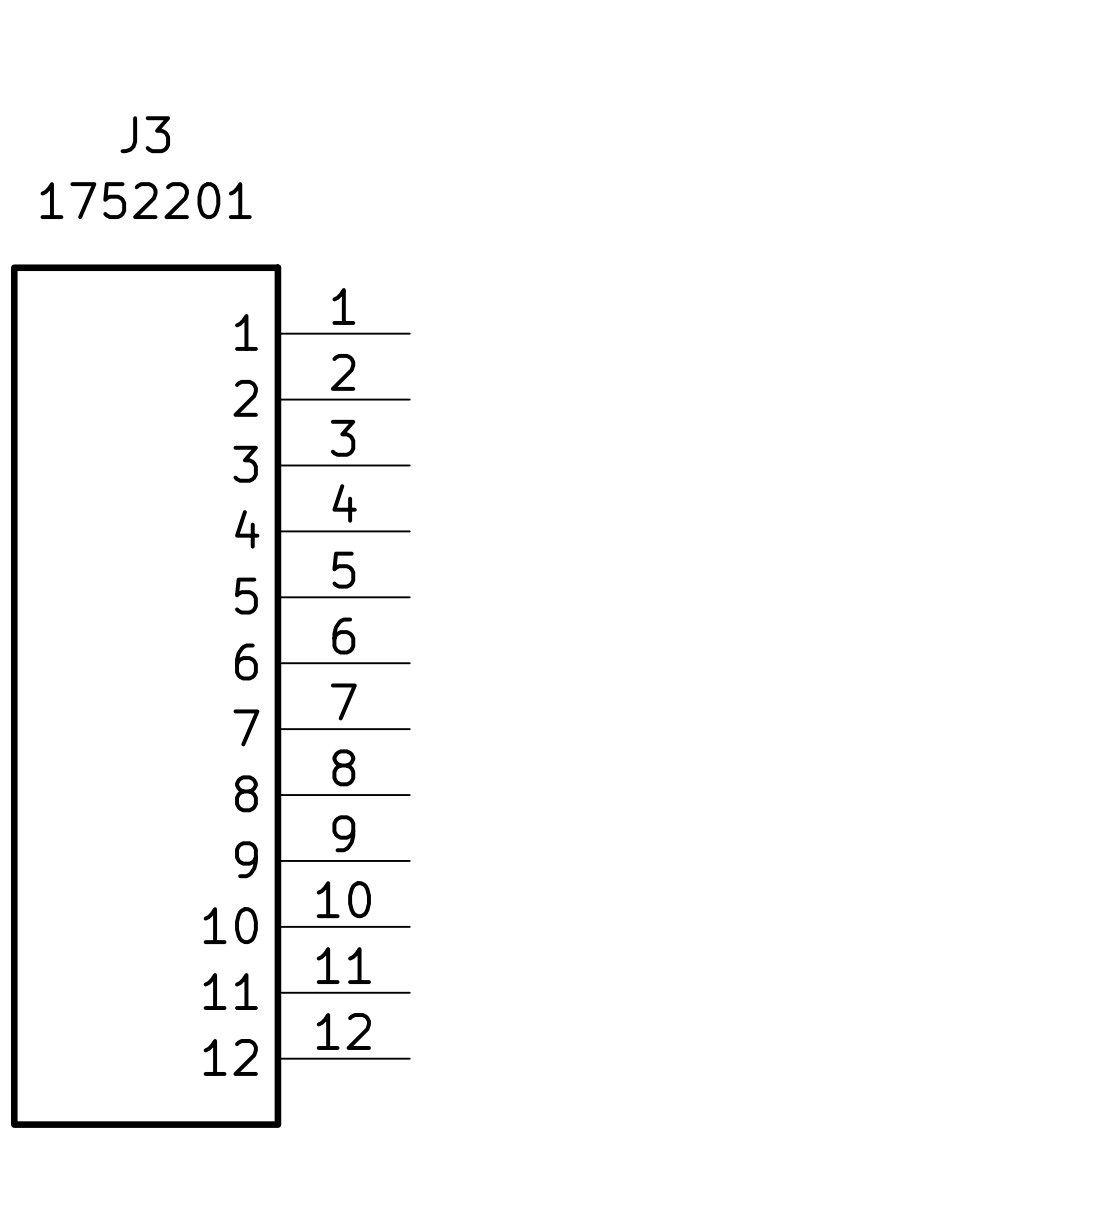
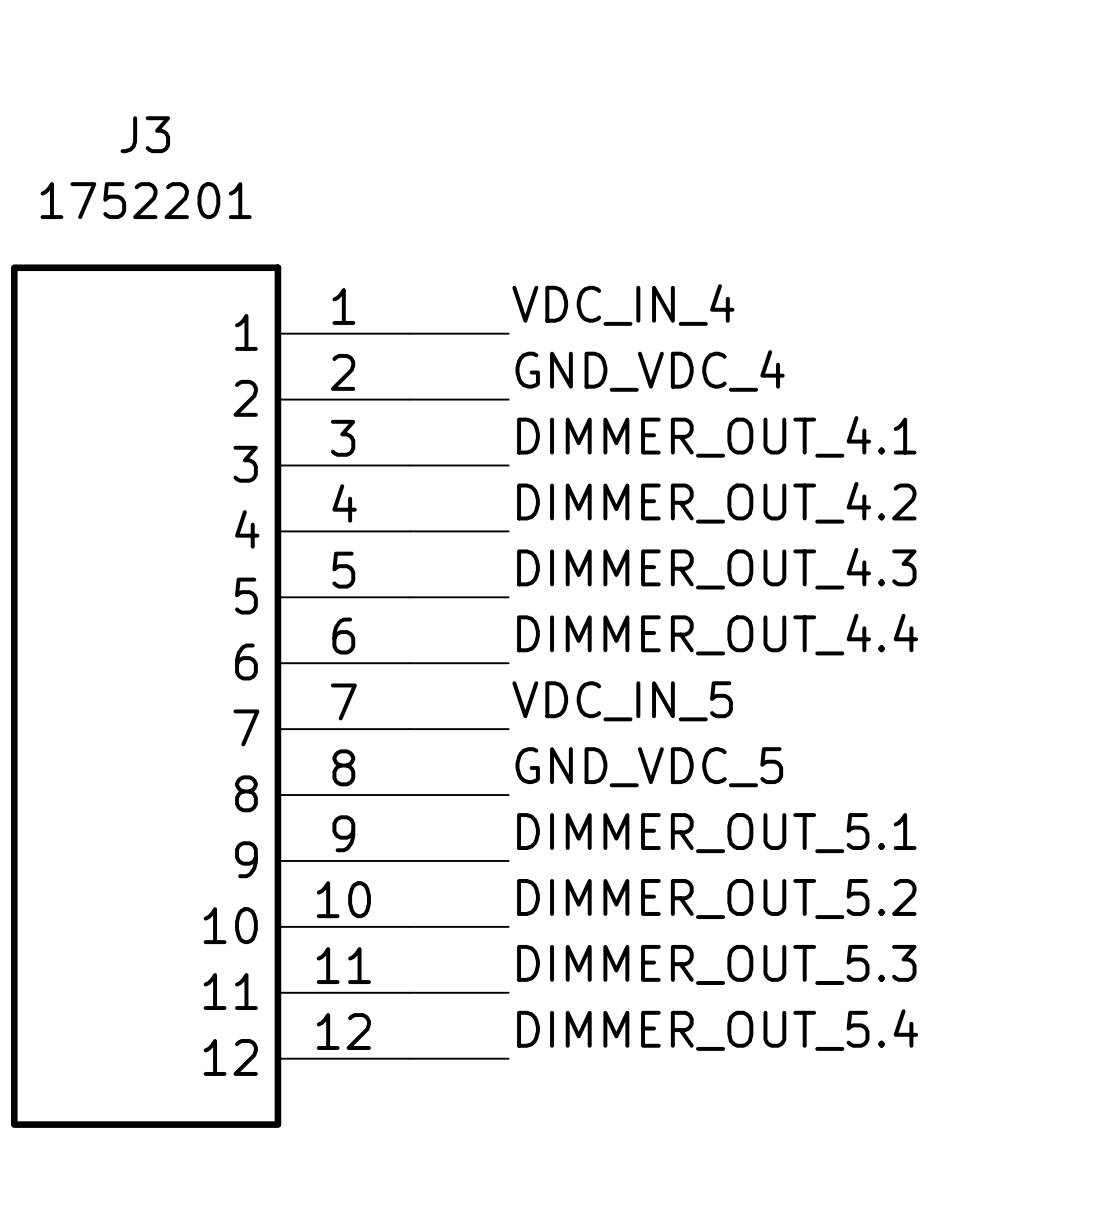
label: none -> VDC_IN_4 (623, 305)
wire: none -> (409, 333) (508, 333)
label: none -> GND_VDC_4 (650, 370)
wire: none -> (409, 399) (508, 399)
label: none -> DIMMER_OUT_4.1 (716, 436)
wire: none -> (409, 465) (508, 465)
label: none -> DIMMER_OUT_4.2 (716, 502)
wire: none -> (409, 531) (508, 531)
label: none -> DIMMER_OUT_4.3 (716, 568)
wire: none -> (409, 597) (508, 597)
label: none -> DIMMER_OUT_4.4 (717, 634)
wire: none -> (409, 663) (508, 663)
label: none -> VDC_IN_5 (622, 701)
wire: none -> (409, 729) (508, 729)
label: none -> GND_VDC_5 (649, 767)
wire: none -> (409, 795) (508, 795)
label: none -> DIMMER_OUT_5.1 (716, 833)
wire: none -> (409, 860) (508, 860)
label: none -> DIMMER_OUT_5.2 (716, 899)
wire: none -> (409, 926) (508, 926)
label: none -> DIMMER_OUT_5.3 (716, 964)
wire: none -> (409, 992) (508, 992)
label: none -> DIMMER_OUT_5.4 (717, 1030)
wire: none -> (409, 1058) (508, 1058)

